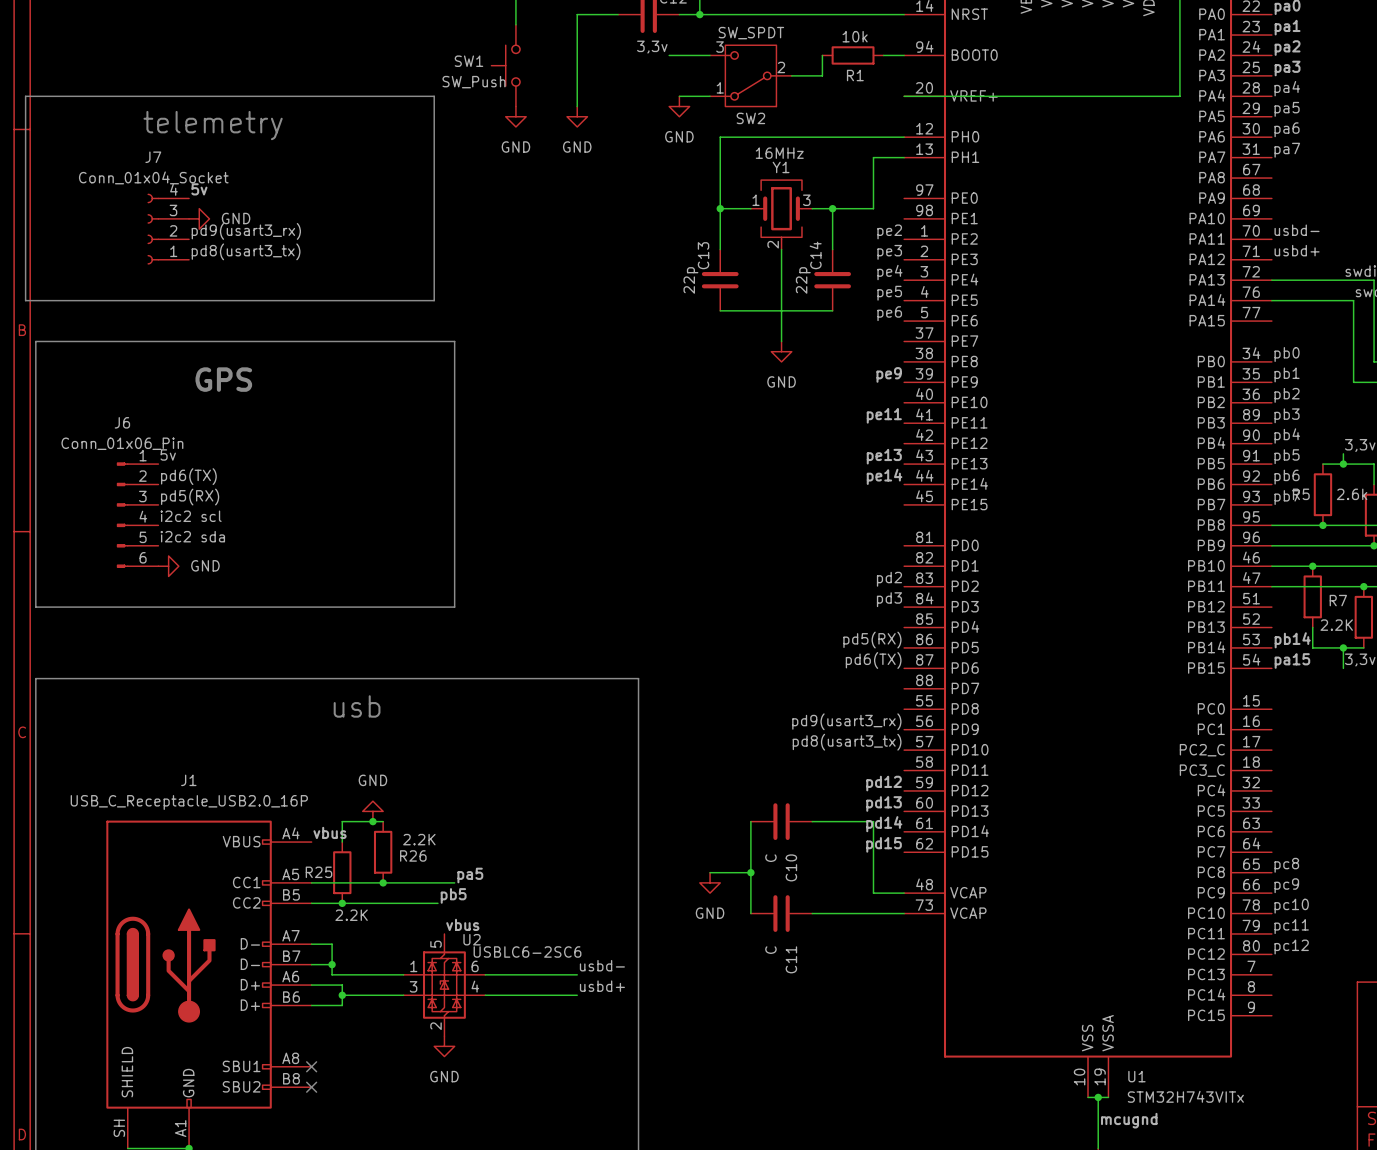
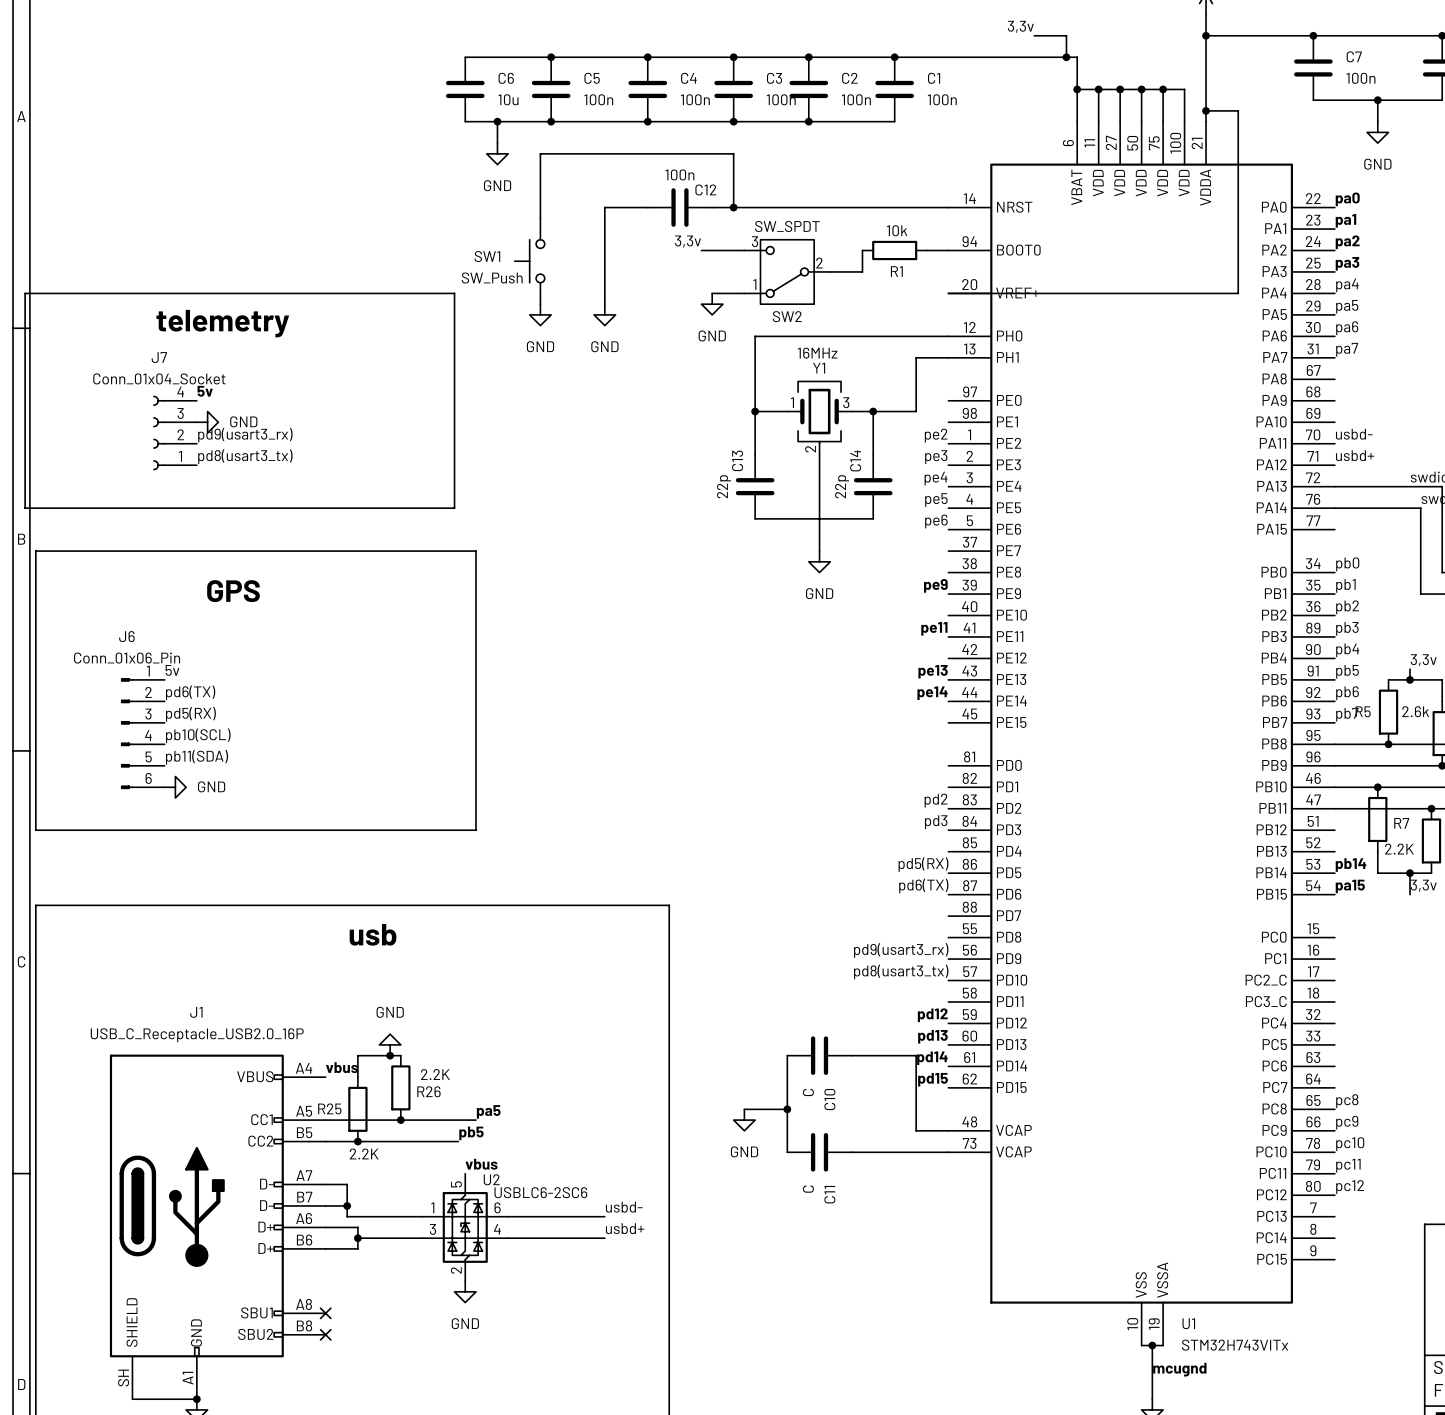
label: i2c2 scl (191, 516) -> pb10(SCL) (198, 735)
label: i2c2 sda (192, 536) -> pb11(SDA) (197, 757)

